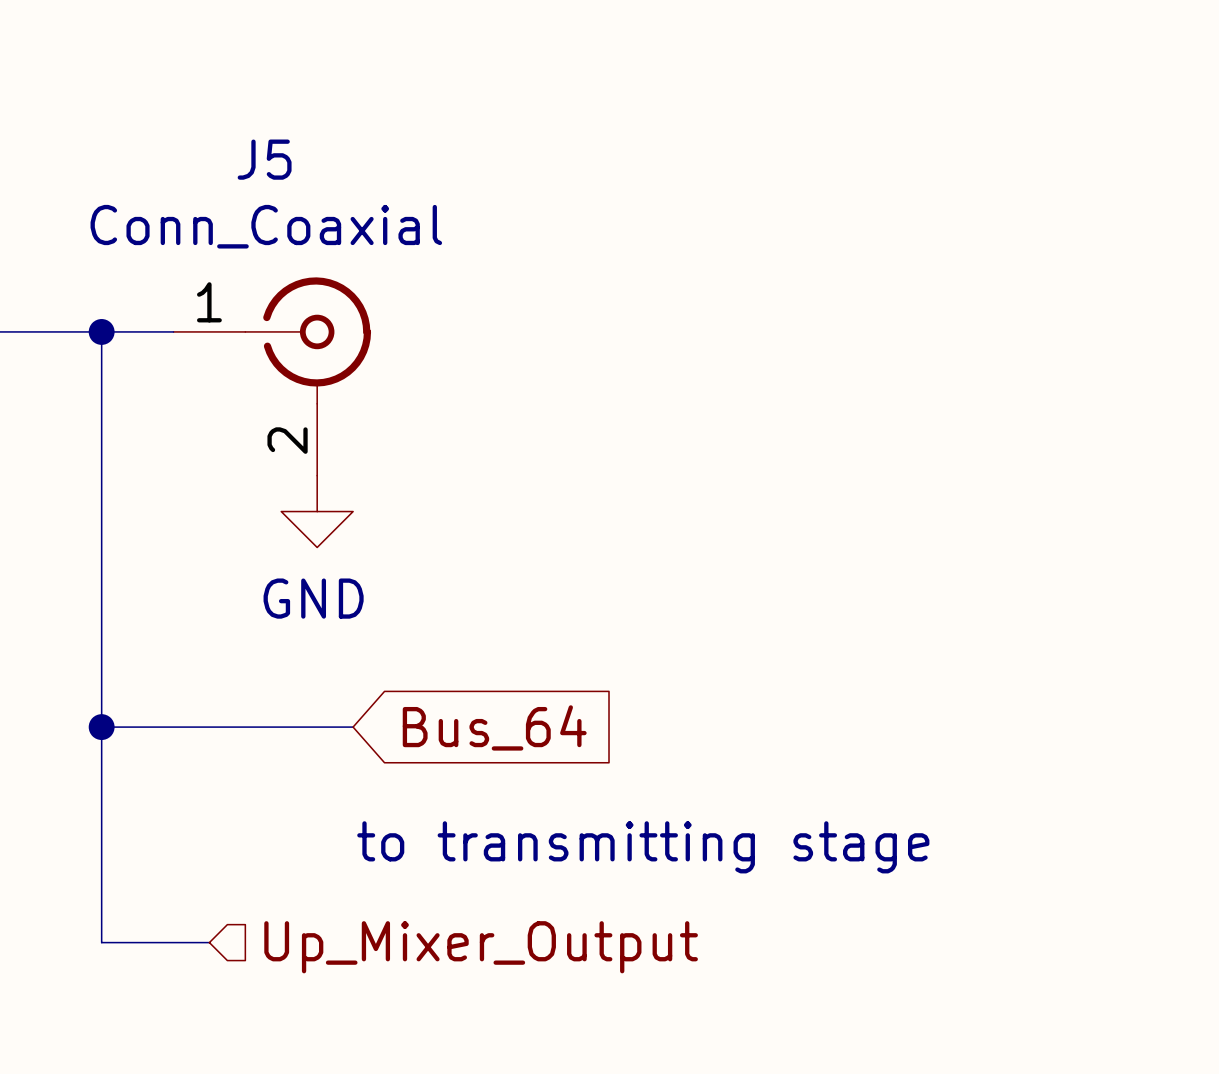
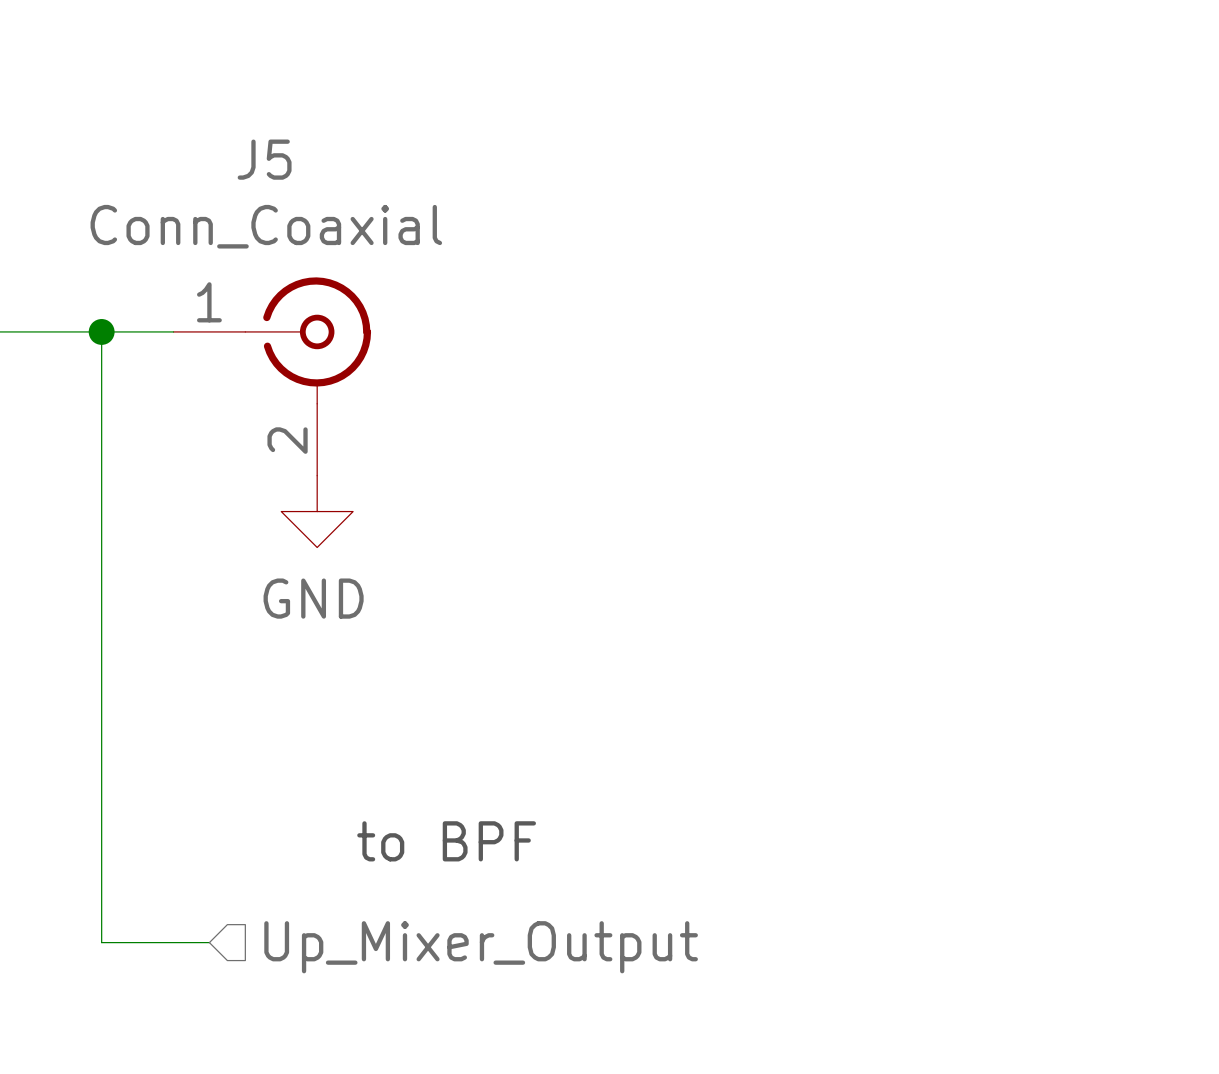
wire: (101, 727) (353, 727) -> none
junction: (101, 727) -> none
global label: Bus_64 (494, 727) -> none
text: to transmitting stage (643, 847) -> to BPF (446, 841)

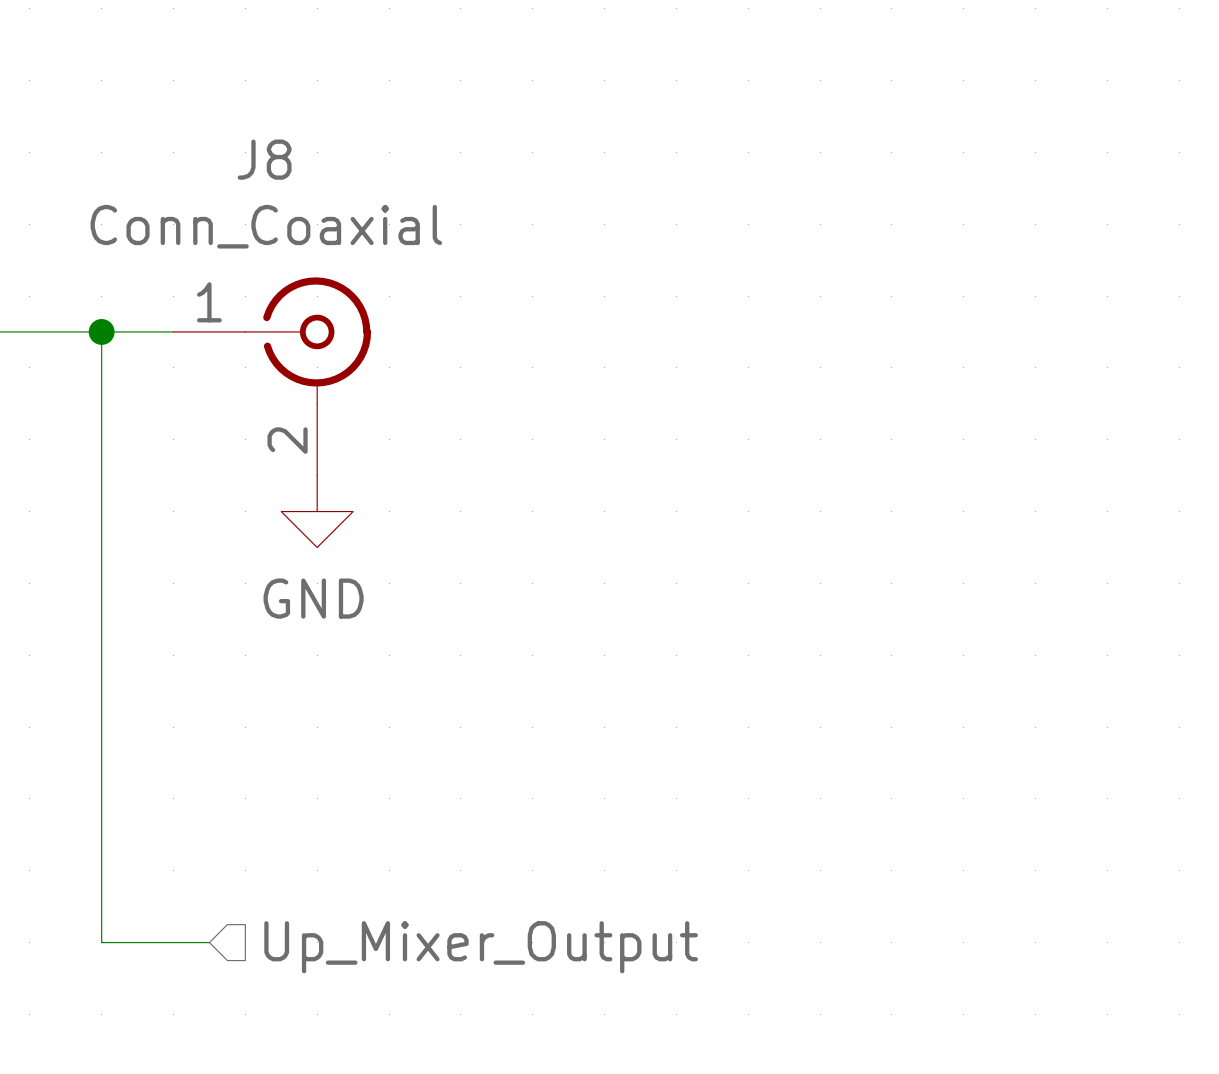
J5 name: J5 (264, 159) -> J8 (264, 159)
text: to BPF (446, 841) -> none

